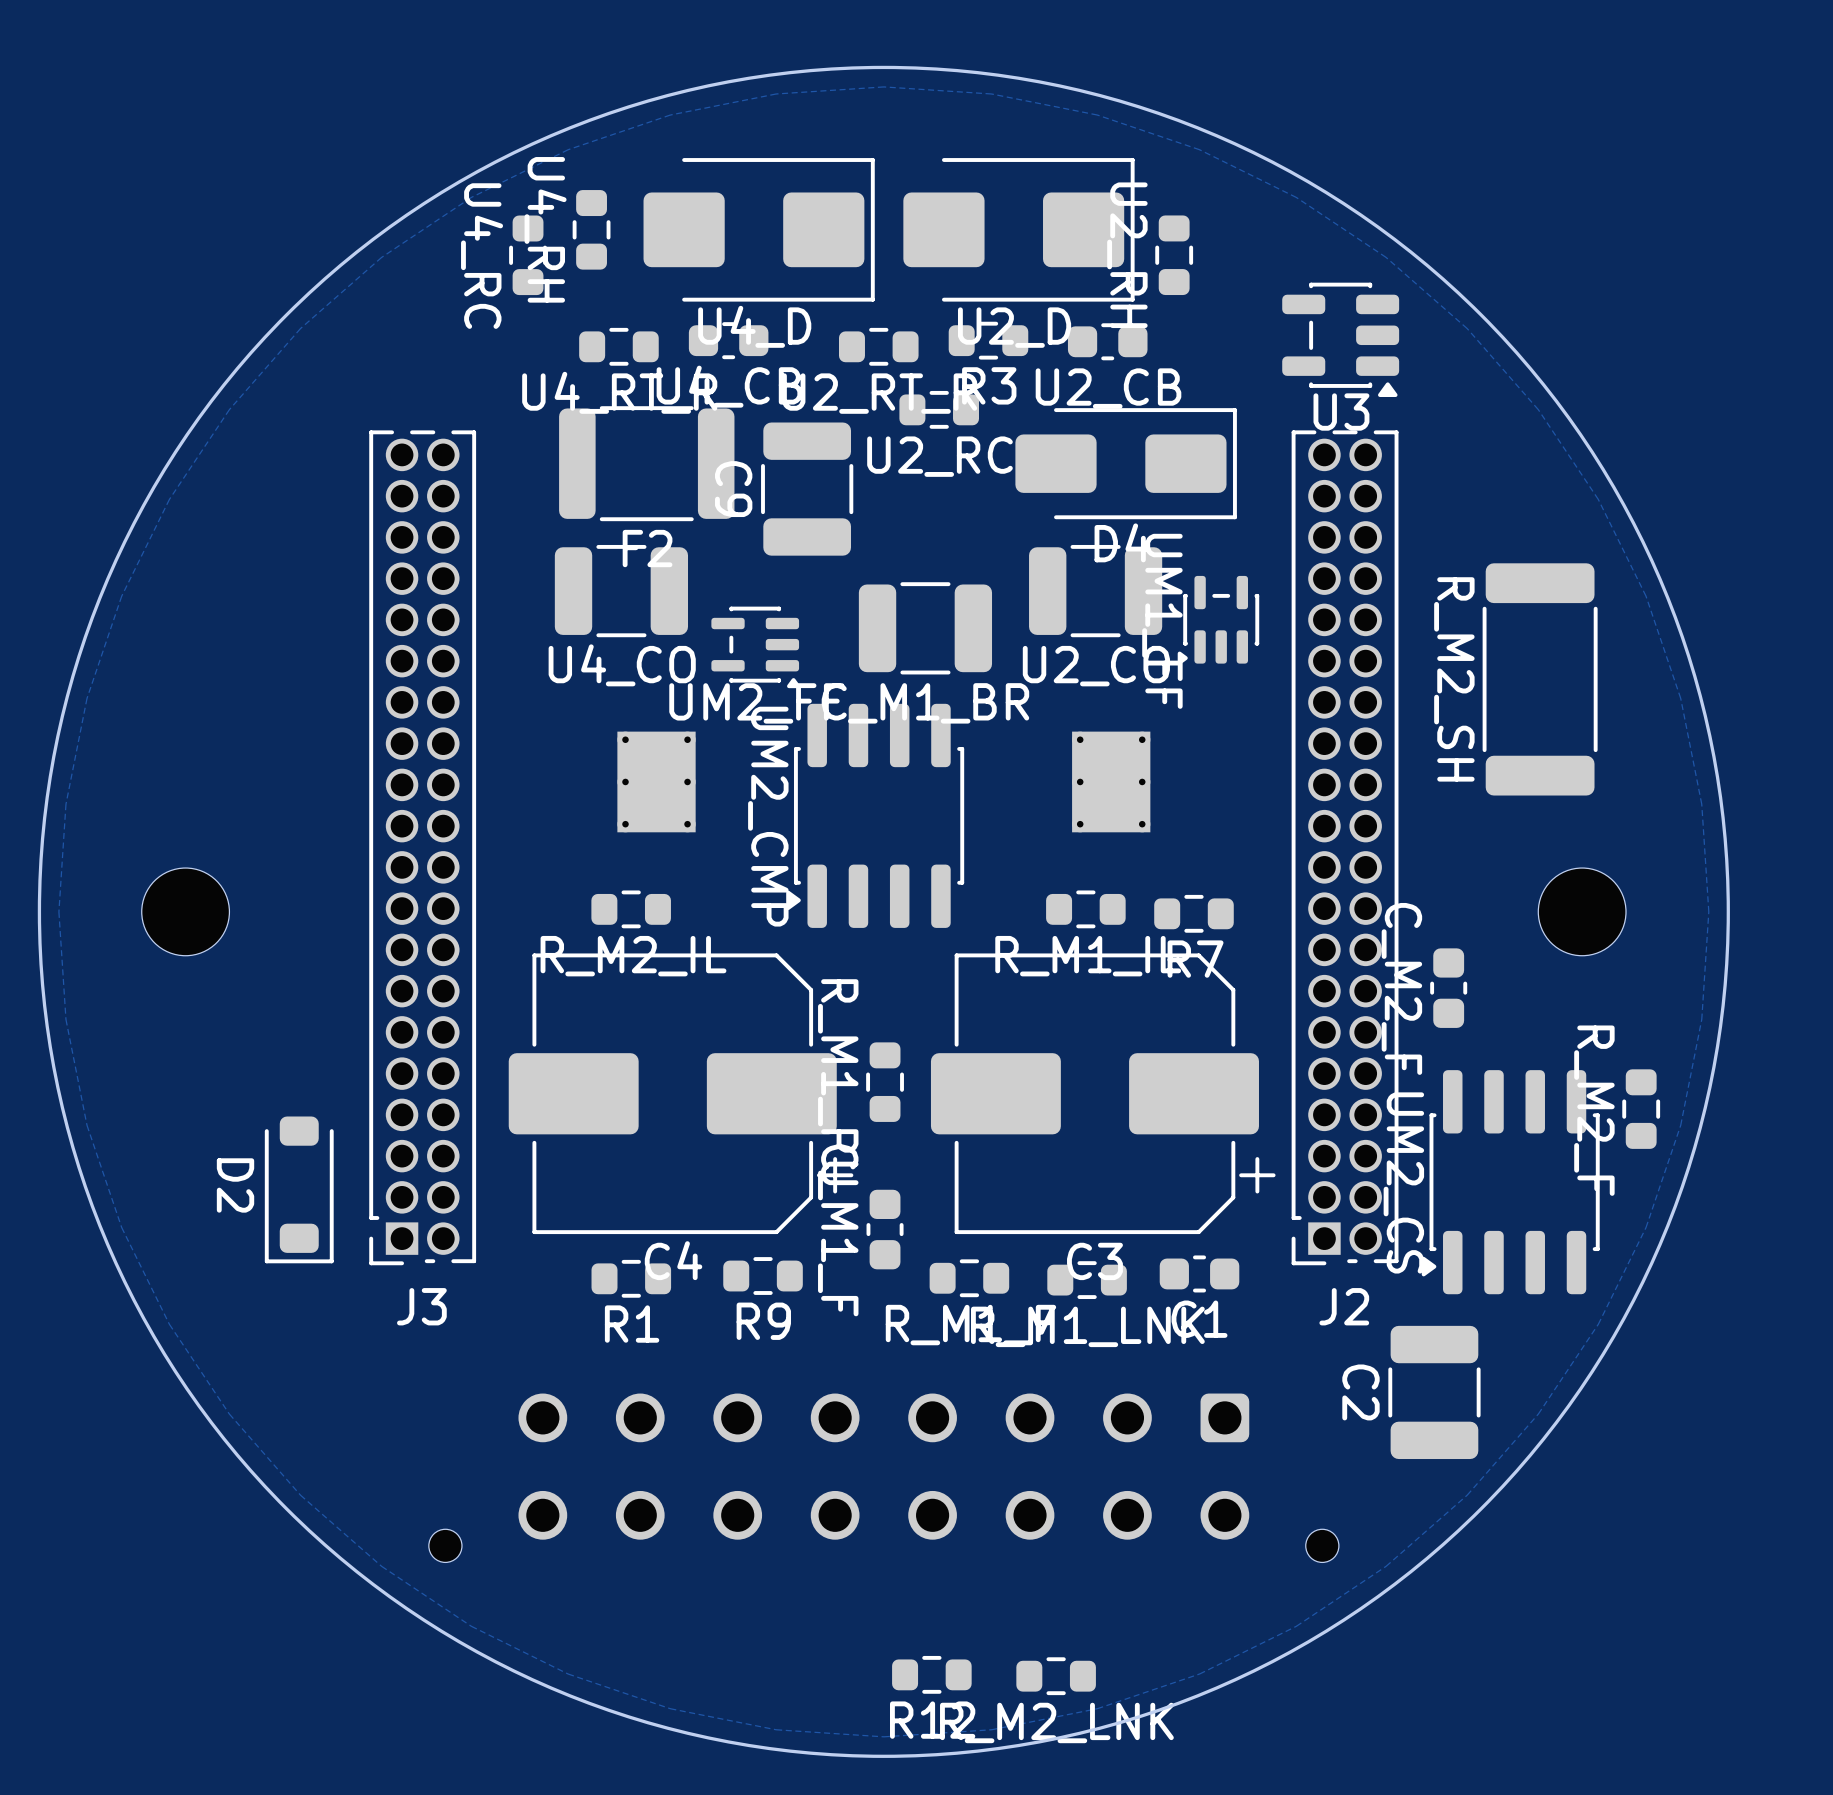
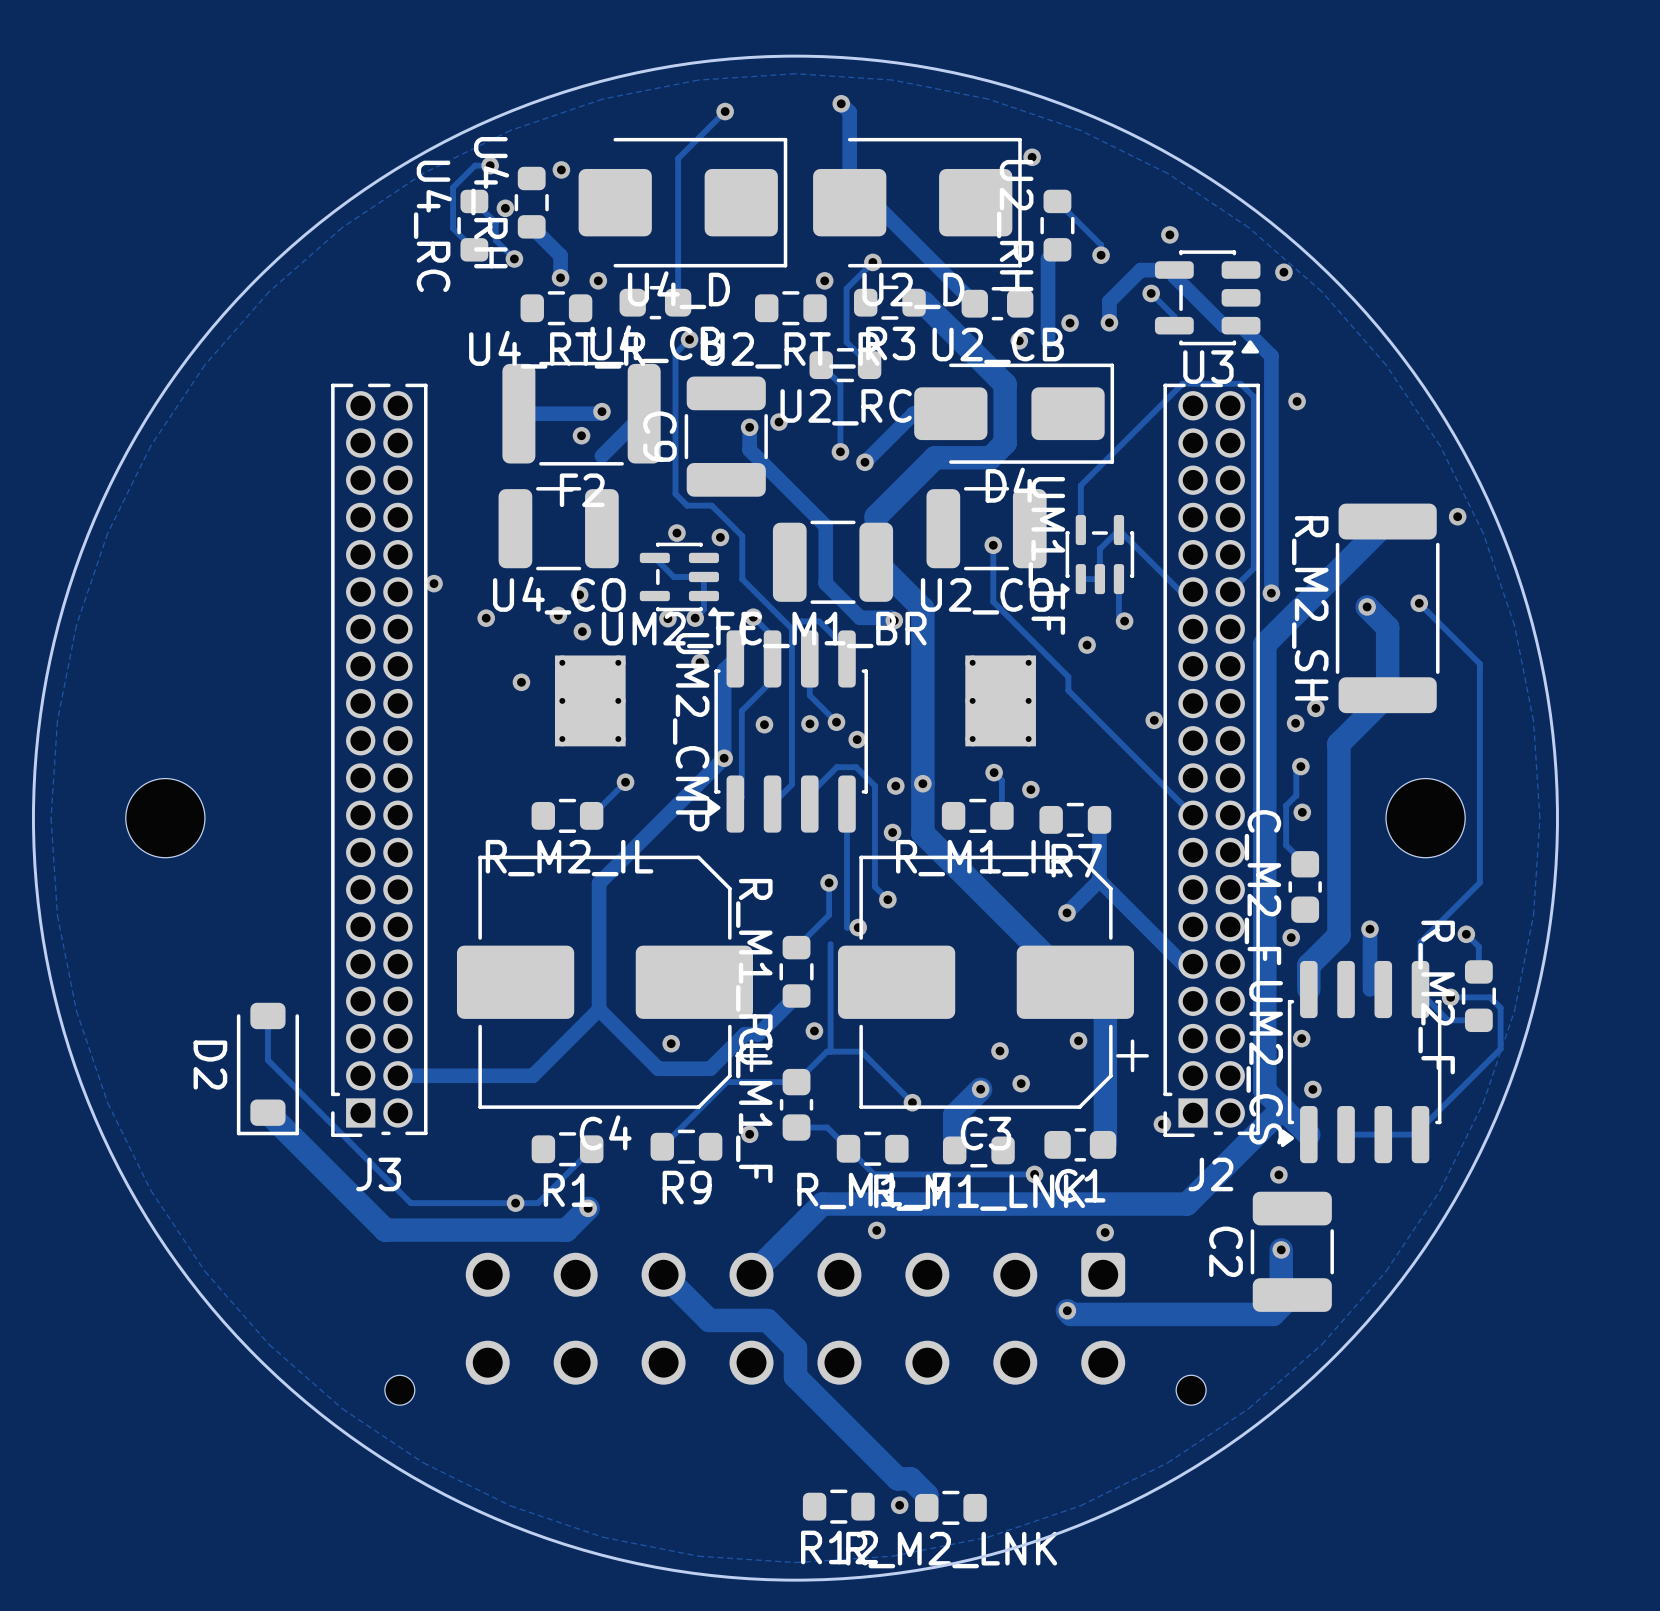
track: none -> (841, 103) (849, 112) (849, 202) (873, 202) (974, 303)
via: none -> (841, 103)
track: none -> (725, 111) (678, 158) (678, 302)
via: none -> (725, 111)
via: none -> (1032, 157)
track: none -> (490, 165) (475, 165) (453, 187) (453, 228) (474, 249)
via: none -> (490, 165)
via: none -> (561, 169)
track: none -> (474, 201) (495, 222) (495, 240) (514, 258)
track: none -> (1057, 201) (1101, 245) (1101, 255)
via: none -> (505, 208)
track: none -> (531, 226) (560, 255) (560, 277)
via: none -> (1169, 234)
track: none -> (1057, 249) (1048, 259) (1048, 340)
via: none -> (1101, 255)
via: none -> (514, 258)
track: none -> (872, 262) (846, 288) (846, 342) (869, 365)
via: none -> (872, 262)
via: none -> (1283, 272)
via: none -> (560, 277)
via: none -> (598, 280)
via: none -> (824, 280)
track: none -> (1151, 293) (1174, 316) (1174, 325)
via: none -> (1151, 293)
track: none -> (914, 302) (923, 302) (1005, 384) (1005, 443) (990, 457) (935, 457) (876, 516) (876, 562) (922, 608) (922, 833) (1071, 982) (1075, 982) (1105, 1012) (1105, 1142) (1103, 1144)
track: none -> (1109, 322) (1109, 301) (1140, 270) (1174, 270) (1174, 276) (1223, 325) (1241, 325) (1271, 356) (1271, 593)
via: none -> (1109, 322)
via: none -> (1070, 323)
track: none -> (689, 339) (675, 353) (675, 493) (687, 505) (711, 505) (742, 536) (742, 579) (793, 630)
via: none -> (689, 339)
via: none -> (1019, 340)
track: none -> (821, 365) (840, 384) (840, 451)
via: none -> (1297, 401)
track: none -> (601, 411) (599, 413) (518, 413)
via: none -> (601, 411)
track: none -> (644, 413) (601, 455)
track: none -> (950, 413) (913, 413) (864, 462)
via: none -> (779, 422)
track: none -> (749, 427) (749, 450) (825, 526) (825, 583) (860, 617) (891, 617) (894, 620)
via: none -> (749, 427)
via: none -> (581, 435)
via: none -> (840, 451)
via: none -> (864, 462)
via: none -> (1457, 516)
track: none -> (1387, 521) (1264, 644) (1264, 1090) (1308, 1134)
track: none -> (1080, 530) (1080, 485) (1182, 383) (1240, 383) (1253, 396) (1253, 568) (1230, 591)
via: none -> (676, 533)
via: none -> (720, 537)
track: none -> (993, 545) (993, 601) (1068, 676) (1068, 690) (1193, 815)
via: none -> (993, 545)
track: none -> (654, 557) (673, 576) (703, 576) (703, 609) (695, 618)
track: none -> (1080, 579) (1099, 579) (1099, 549) (1118, 530) (1180, 591) (1193, 591)
track: none -> (1118, 579) (1118, 615) (1124, 621)
via: none -> (434, 583)
via: none -> (1271, 593)
via: none -> (579, 594)
track: none -> (1419, 603) (1479, 663) (1479, 882) (1420, 942) (1420, 992) (1447, 1020) (1478, 1020)
via: none -> (1419, 603)
track: none -> (1367, 606) (1387, 627) (1387, 695) (1338, 743) (1338, 935) (1308, 965) (1308, 989)
via: none -> (1367, 606)
via: none -> (558, 615)
track: none -> (753, 617) (772, 636) (772, 680) (741, 710) (741, 797) (735, 804)
via: none -> (753, 617)
via: none -> (486, 618)
via: none -> (667, 618)
via: none -> (695, 618)
via: none -> (894, 620)
via: none -> (1124, 621)
via: none -> (582, 631)
via: none -> (1087, 645)
track: none -> (735, 658) (724, 670) (724, 758) (599, 883) (599, 1009)
track: none -> (809, 658) (809, 695) (836, 722)
track: none -> (846, 658) (846, 649) (819, 621) (801, 621) (791, 631) (791, 784) (772, 804)
via: none -> (699, 662)
via: none -> (521, 682)
via: none -> (1315, 708)
via: none -> (1154, 720)
via: none -> (836, 722)
via: none -> (1295, 723)
via: none -> (809, 723)
via: none -> (764, 724)
via: none -> (857, 739)
via: none -> (724, 758)
track: none -> (1300, 766) (1296, 771) (1296, 795) (1286, 805) (1286, 845) (1305, 864)
via: none -> (1300, 766)
track: none -> (994, 772) (1001, 780) (1001, 815)
via: none -> (994, 772)
track: none -> (625, 782) (591, 815)
via: none -> (625, 782)
via: none -> (922, 783)
via: none -> (895, 786)
via: none -> (1030, 789)
track: none -> (809, 804) (809, 794) (836, 767) (856, 767) (874, 786) (874, 886) (887, 899)
track: none -> (846, 804) (846, 927) (858, 927)
via: none -> (1302, 812)
track: none -> (1099, 819) (1099, 880)
via: none -> (892, 832)
track: none -> (1099, 880) (1067, 912)
track: none -> (1099, 880) (1183, 964) (1193, 964)
track: none -> (829, 882) (829, 915) (796, 947)
via: none -> (829, 882)
via: none -> (887, 899)
via: none -> (1067, 912)
via: none -> (858, 927)
track: none -> (1370, 929) (1370, 989)
via: none -> (1370, 929)
track: none -> (1466, 934) (1478, 946) (1478, 971)
via: none -> (1466, 934)
via: none -> (1291, 937)
track: none -> (830, 944) (830, 1051)
track: none -> (796, 995) (758, 1034) (744, 1034) (710, 1068) (658, 1068) (599, 1009)
track: none -> (1450, 997) (1490, 997) (1500, 1007) (1500, 1048) (1420, 1129) (1420, 1134) (1346, 1134)
via: none -> (1450, 997)
track: none -> (599, 1009) (532, 1075) (397, 1075)
track: none -> (267, 1015) (267, 1060) (410, 1203) (537, 1203) (591, 1149)
via: none -> (814, 1031)
via: none -> (1301, 1038)
via: none -> (1078, 1040)
via: none -> (671, 1043)
via: none -> (999, 1051)
via: none -> (1021, 1083)
track: none -> (980, 1089) (954, 1115) (954, 1150)
via: none -> (980, 1089)
via: none -> (1312, 1089)
track: none -> (912, 1102) (861, 1051) (826, 1051) (796, 1082) (726, 1082) (662, 1146)
via: none -> (912, 1102)
track: none -> (1282, 1108) (1186, 1204) (822, 1204) (751, 1274)
track: none -> (267, 1112) (385, 1230) (566, 1230) (588, 1208)
via: none -> (1162, 1124)
track: none -> (796, 1127) (827, 1127) (874, 1174) (1034, 1174)
via: none -> (749, 1134)
via: none -> (1034, 1174)
via: none -> (1278, 1174)
via: none -> (515, 1203)
via: none -> (588, 1208)
via: none -> (876, 1230)
via: none -> (1105, 1232)
track: none -> (1281, 1249) (1281, 1283) (1292, 1295) (1272, 1314) (1071, 1314) (1067, 1310)
via: none -> (1281, 1249)
track: none -> (663, 1274) (709, 1320) (767, 1320) (795, 1348) (795, 1376) (897, 1478) (910, 1478) (926, 1495) (926, 1507)
via: none -> (1067, 1310)
via: none -> (899, 1505)

